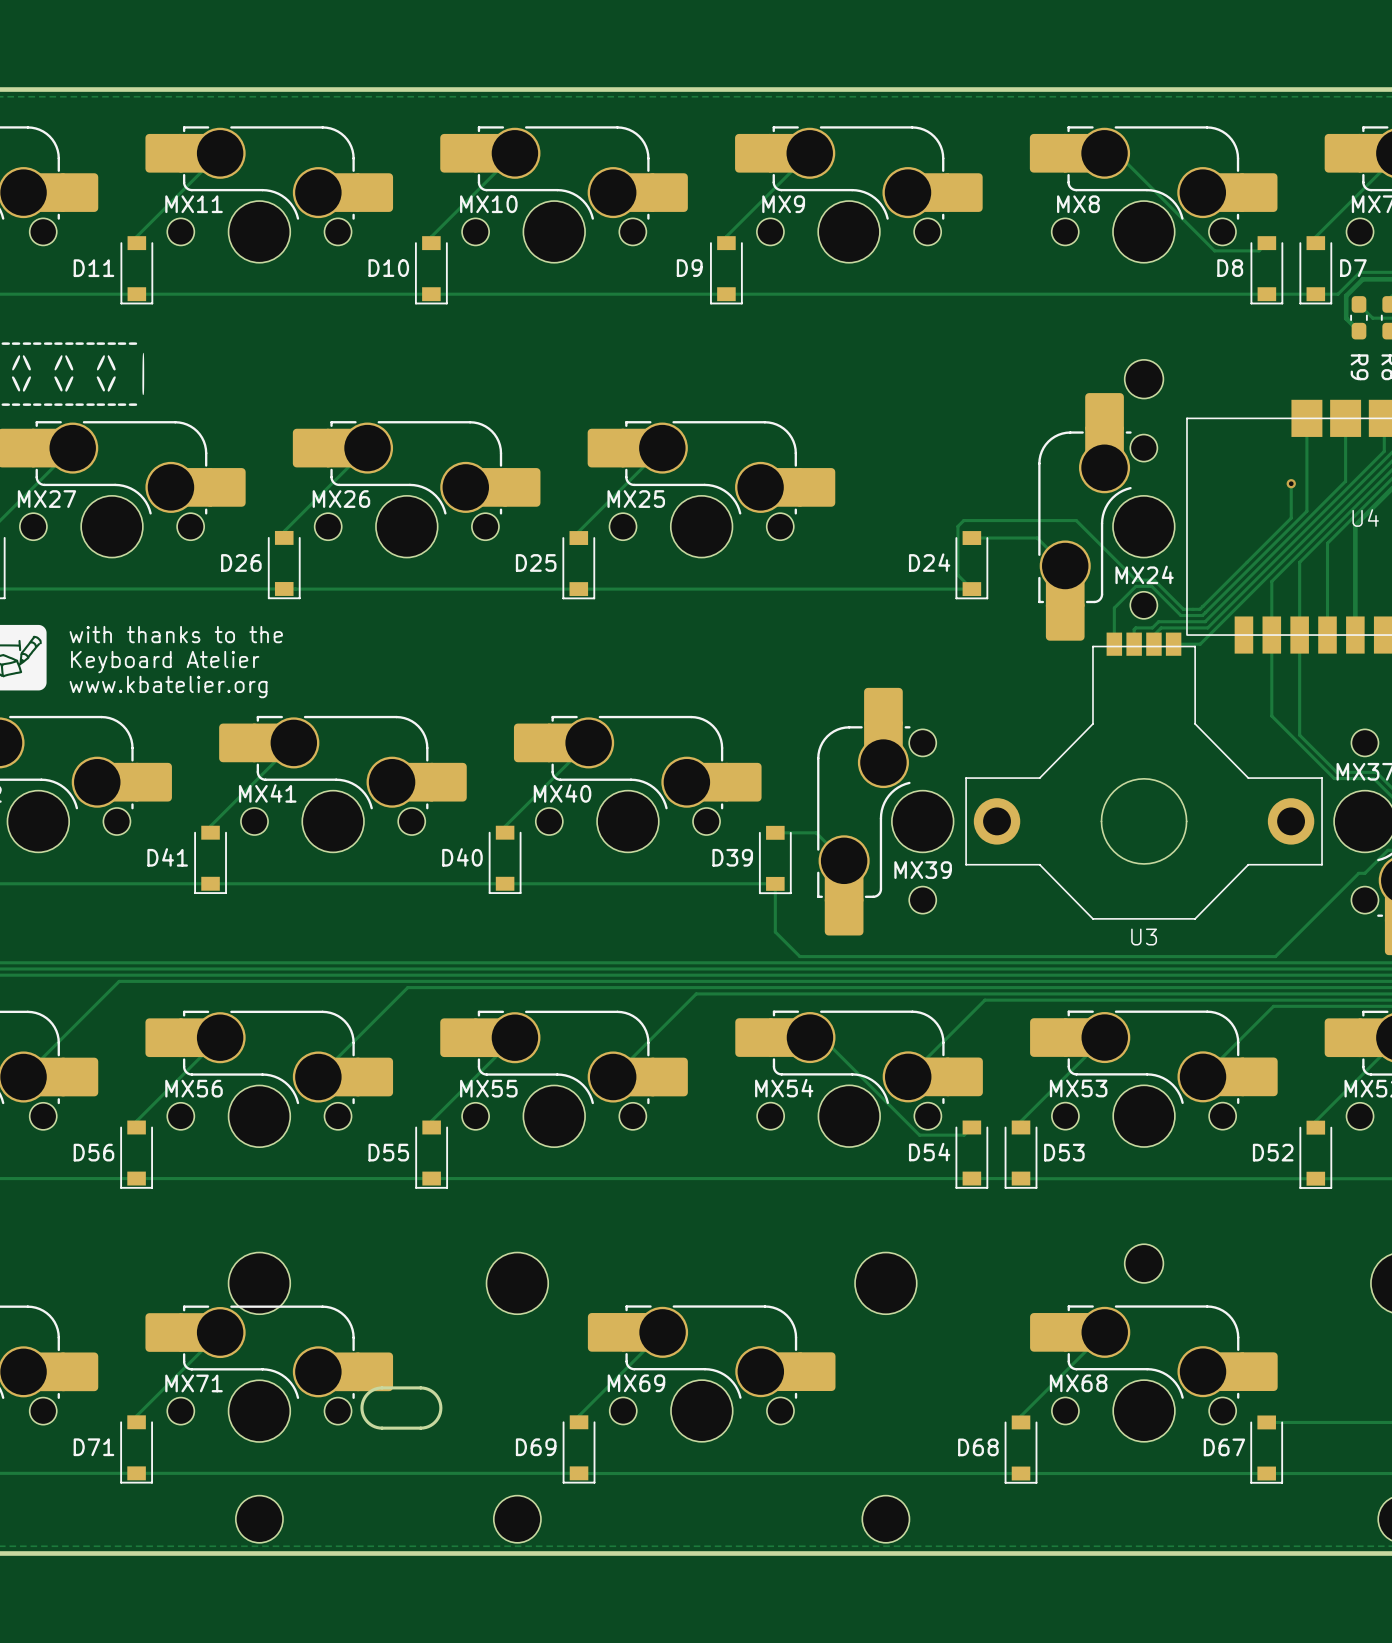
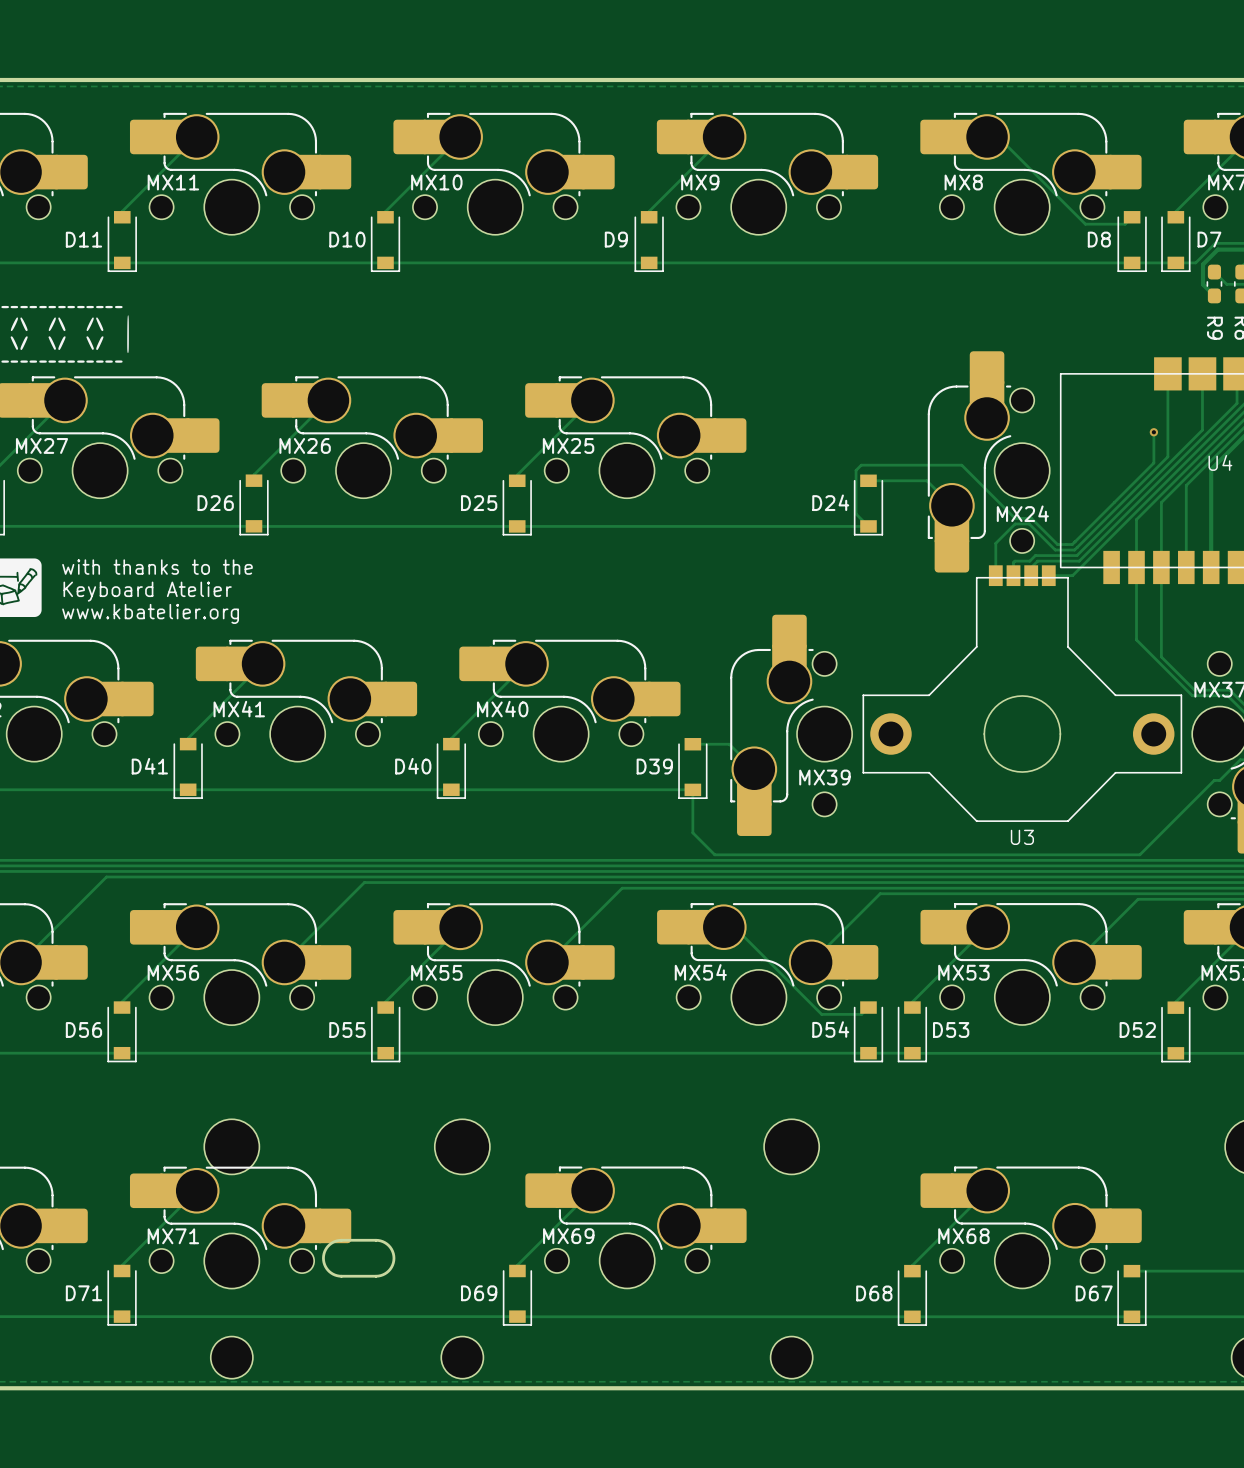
part: (1144, 379) -> none
part: (1144, 1263) -> none

